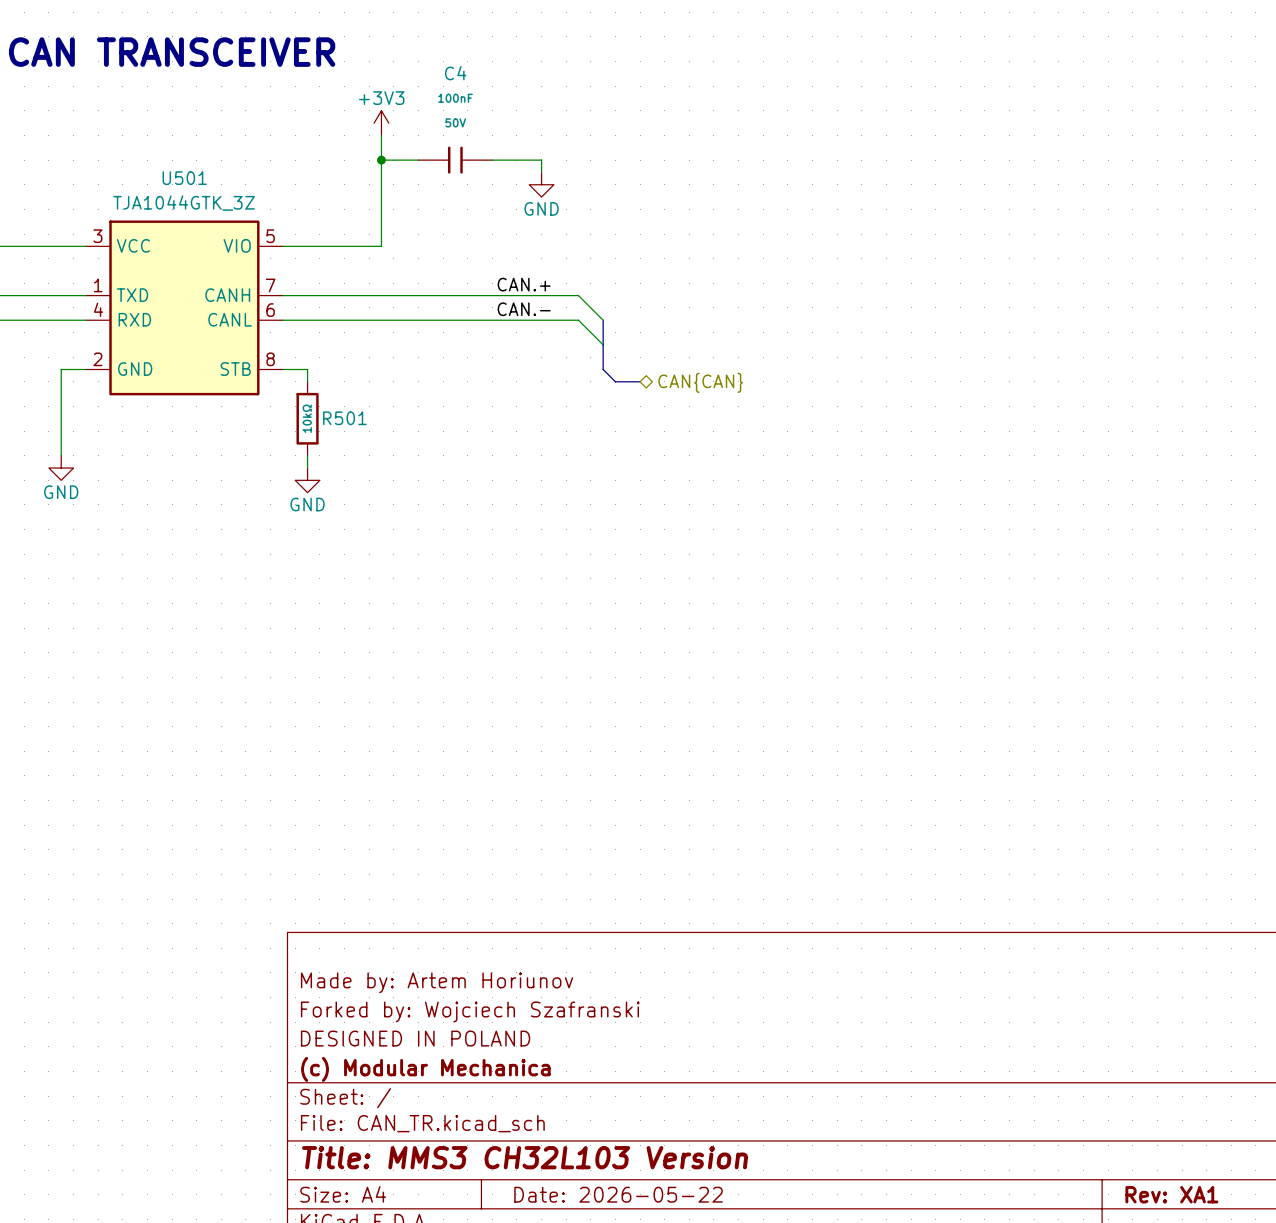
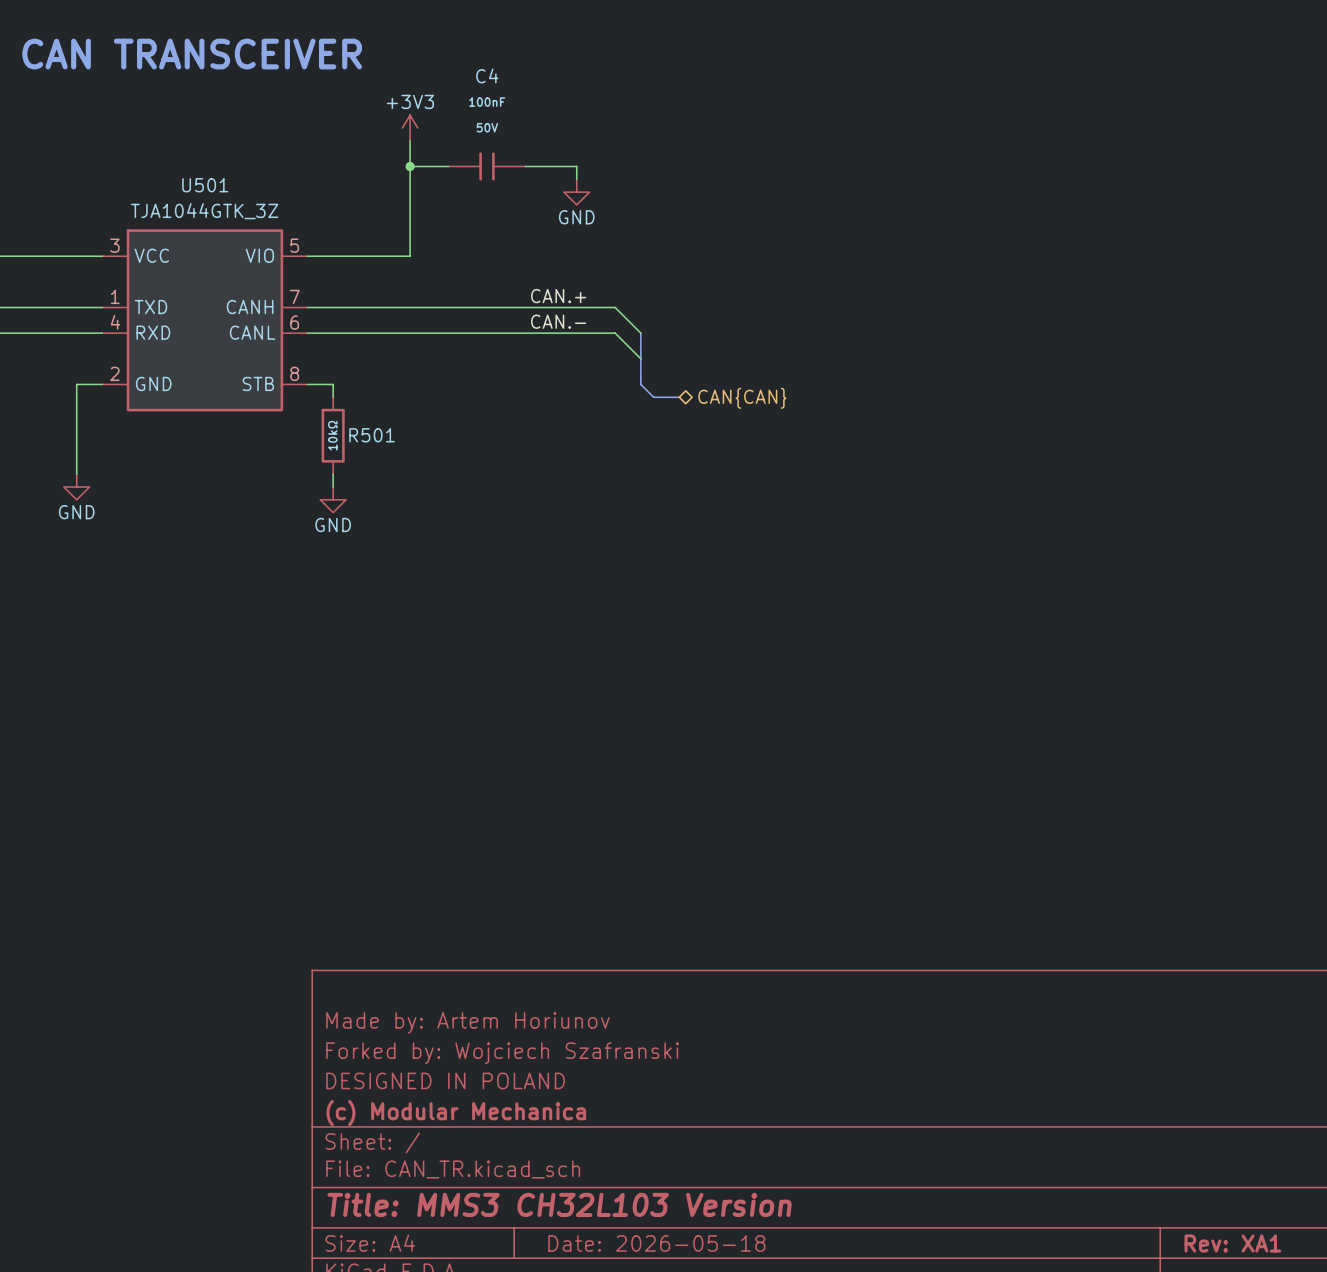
title block: Date: 2026-05-22 (618, 1194) -> Date: 2026-05-18 (656, 1243)

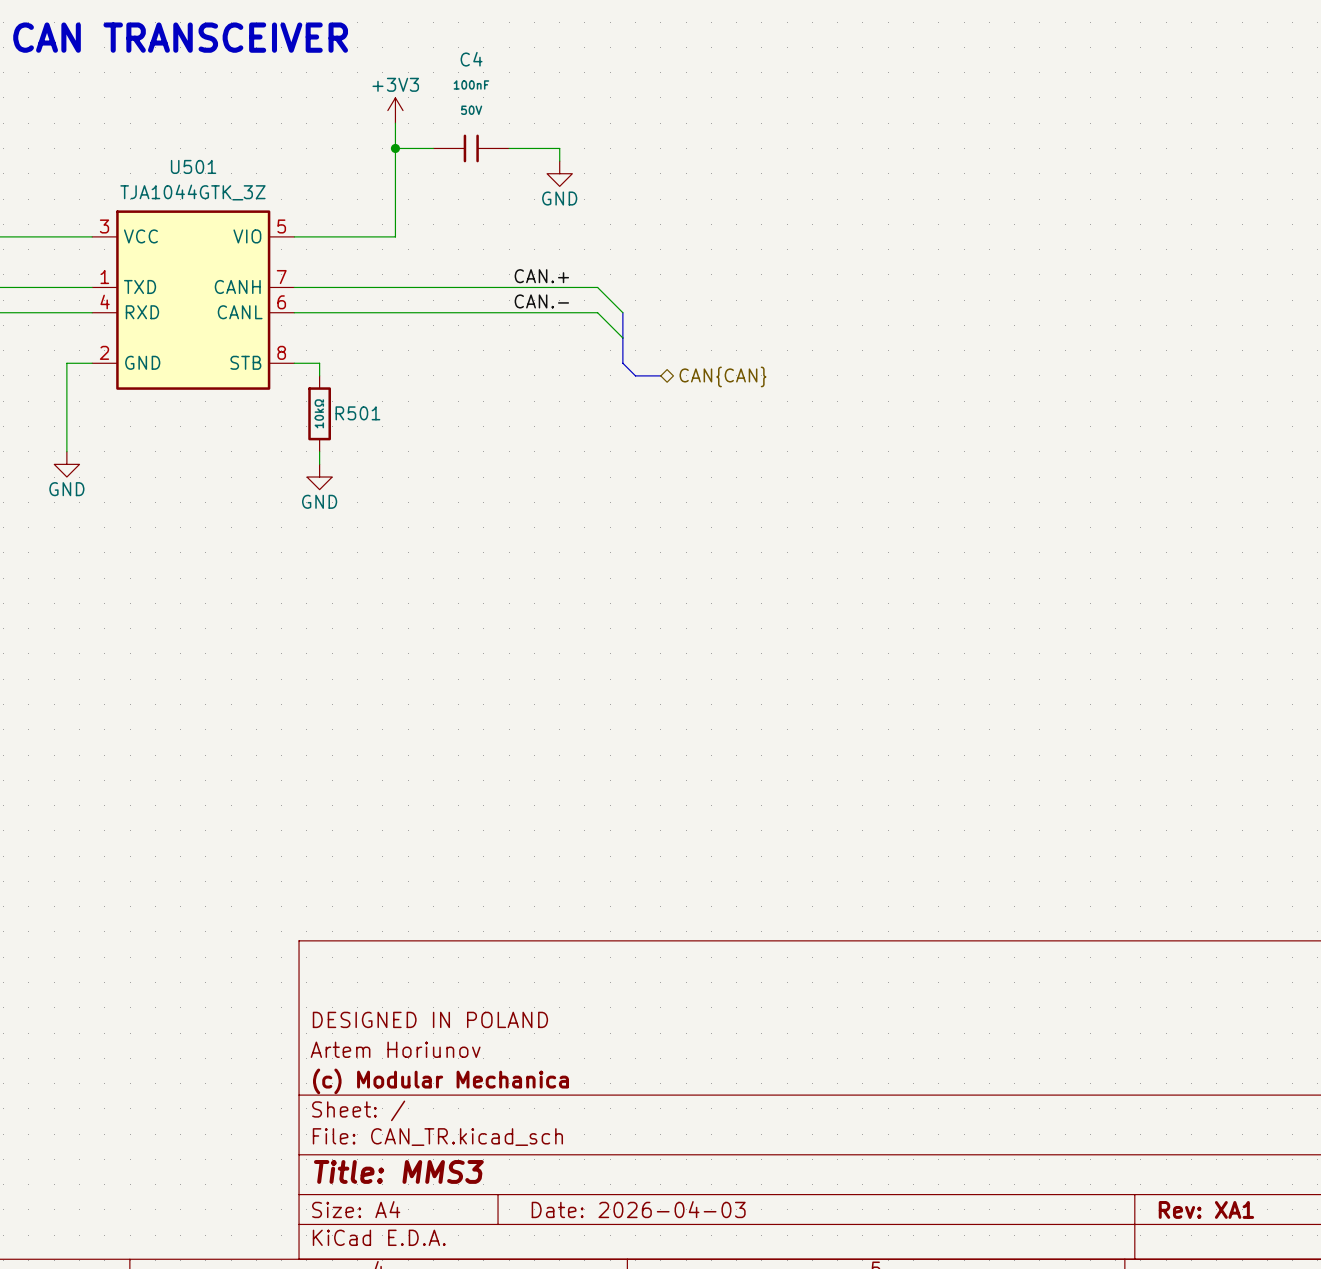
title block: Made by: Artem Horiunov (467, 1022) -> none
title block: Forked by: Wojciech Szafranski (502, 1053) -> DESIGNED IN POLAND (430, 1019)
title block: DESIGNED IN POLAND (445, 1080) -> Artem Horiunov (395, 1049)
title block: Title: MMS3 CH32L103 Version (559, 1204) -> Title: MMS3 (398, 1171)
title block: Date: 2026-05-18 (656, 1243) -> Date: 2026-04-03 (638, 1209)

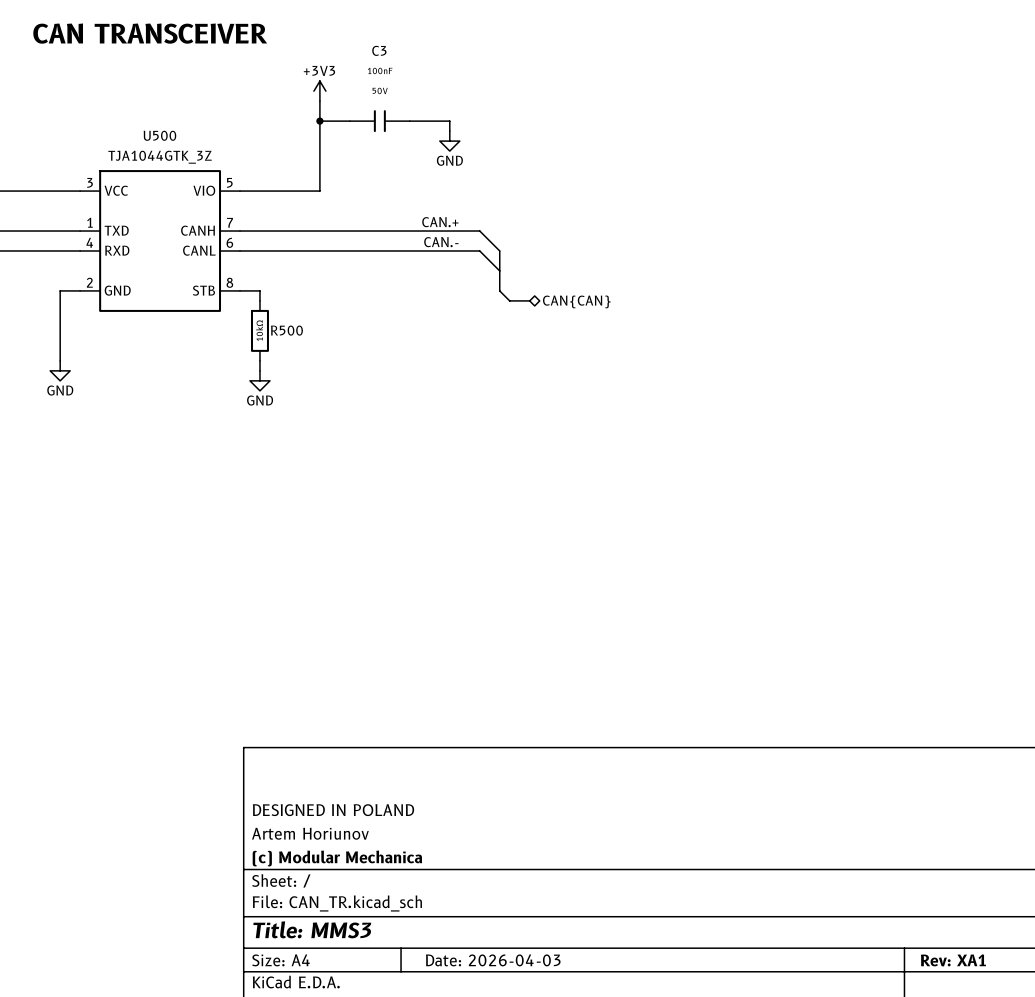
C4 name: C4 (471, 59) -> C3 (379, 50)
U501 name: U501 (193, 166) -> U500 (159, 135)
R501 name: R501 (357, 413) -> R500 (286, 330)

